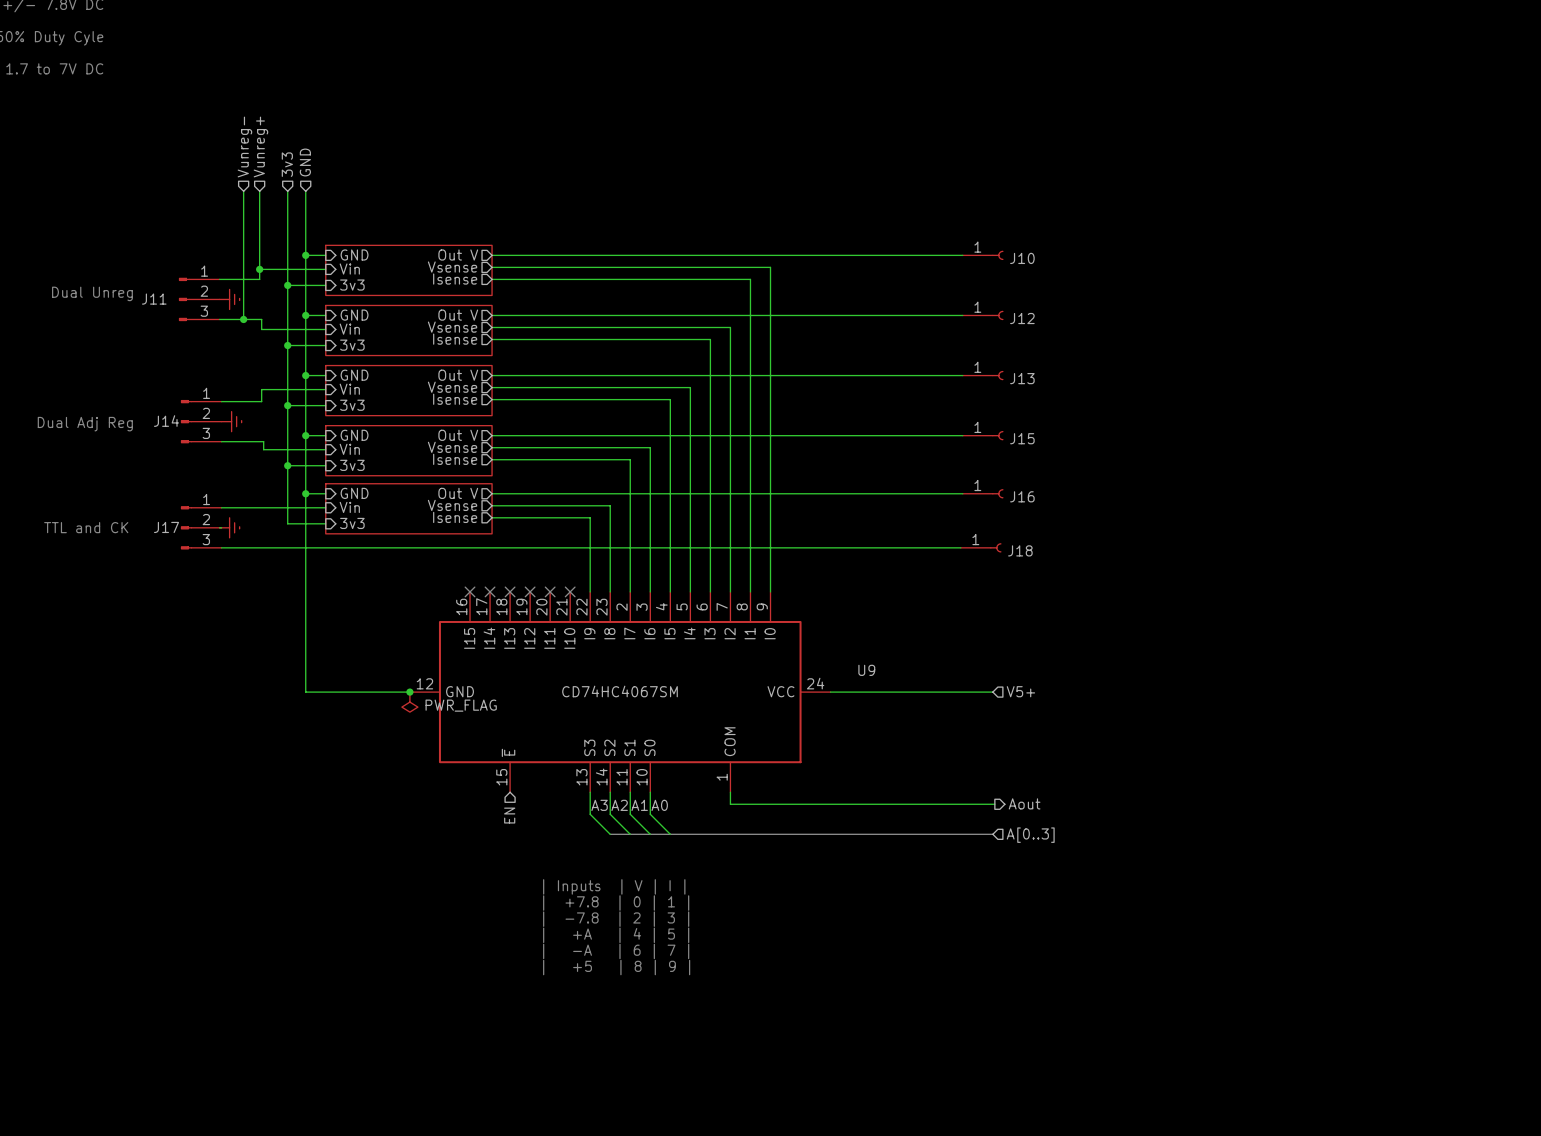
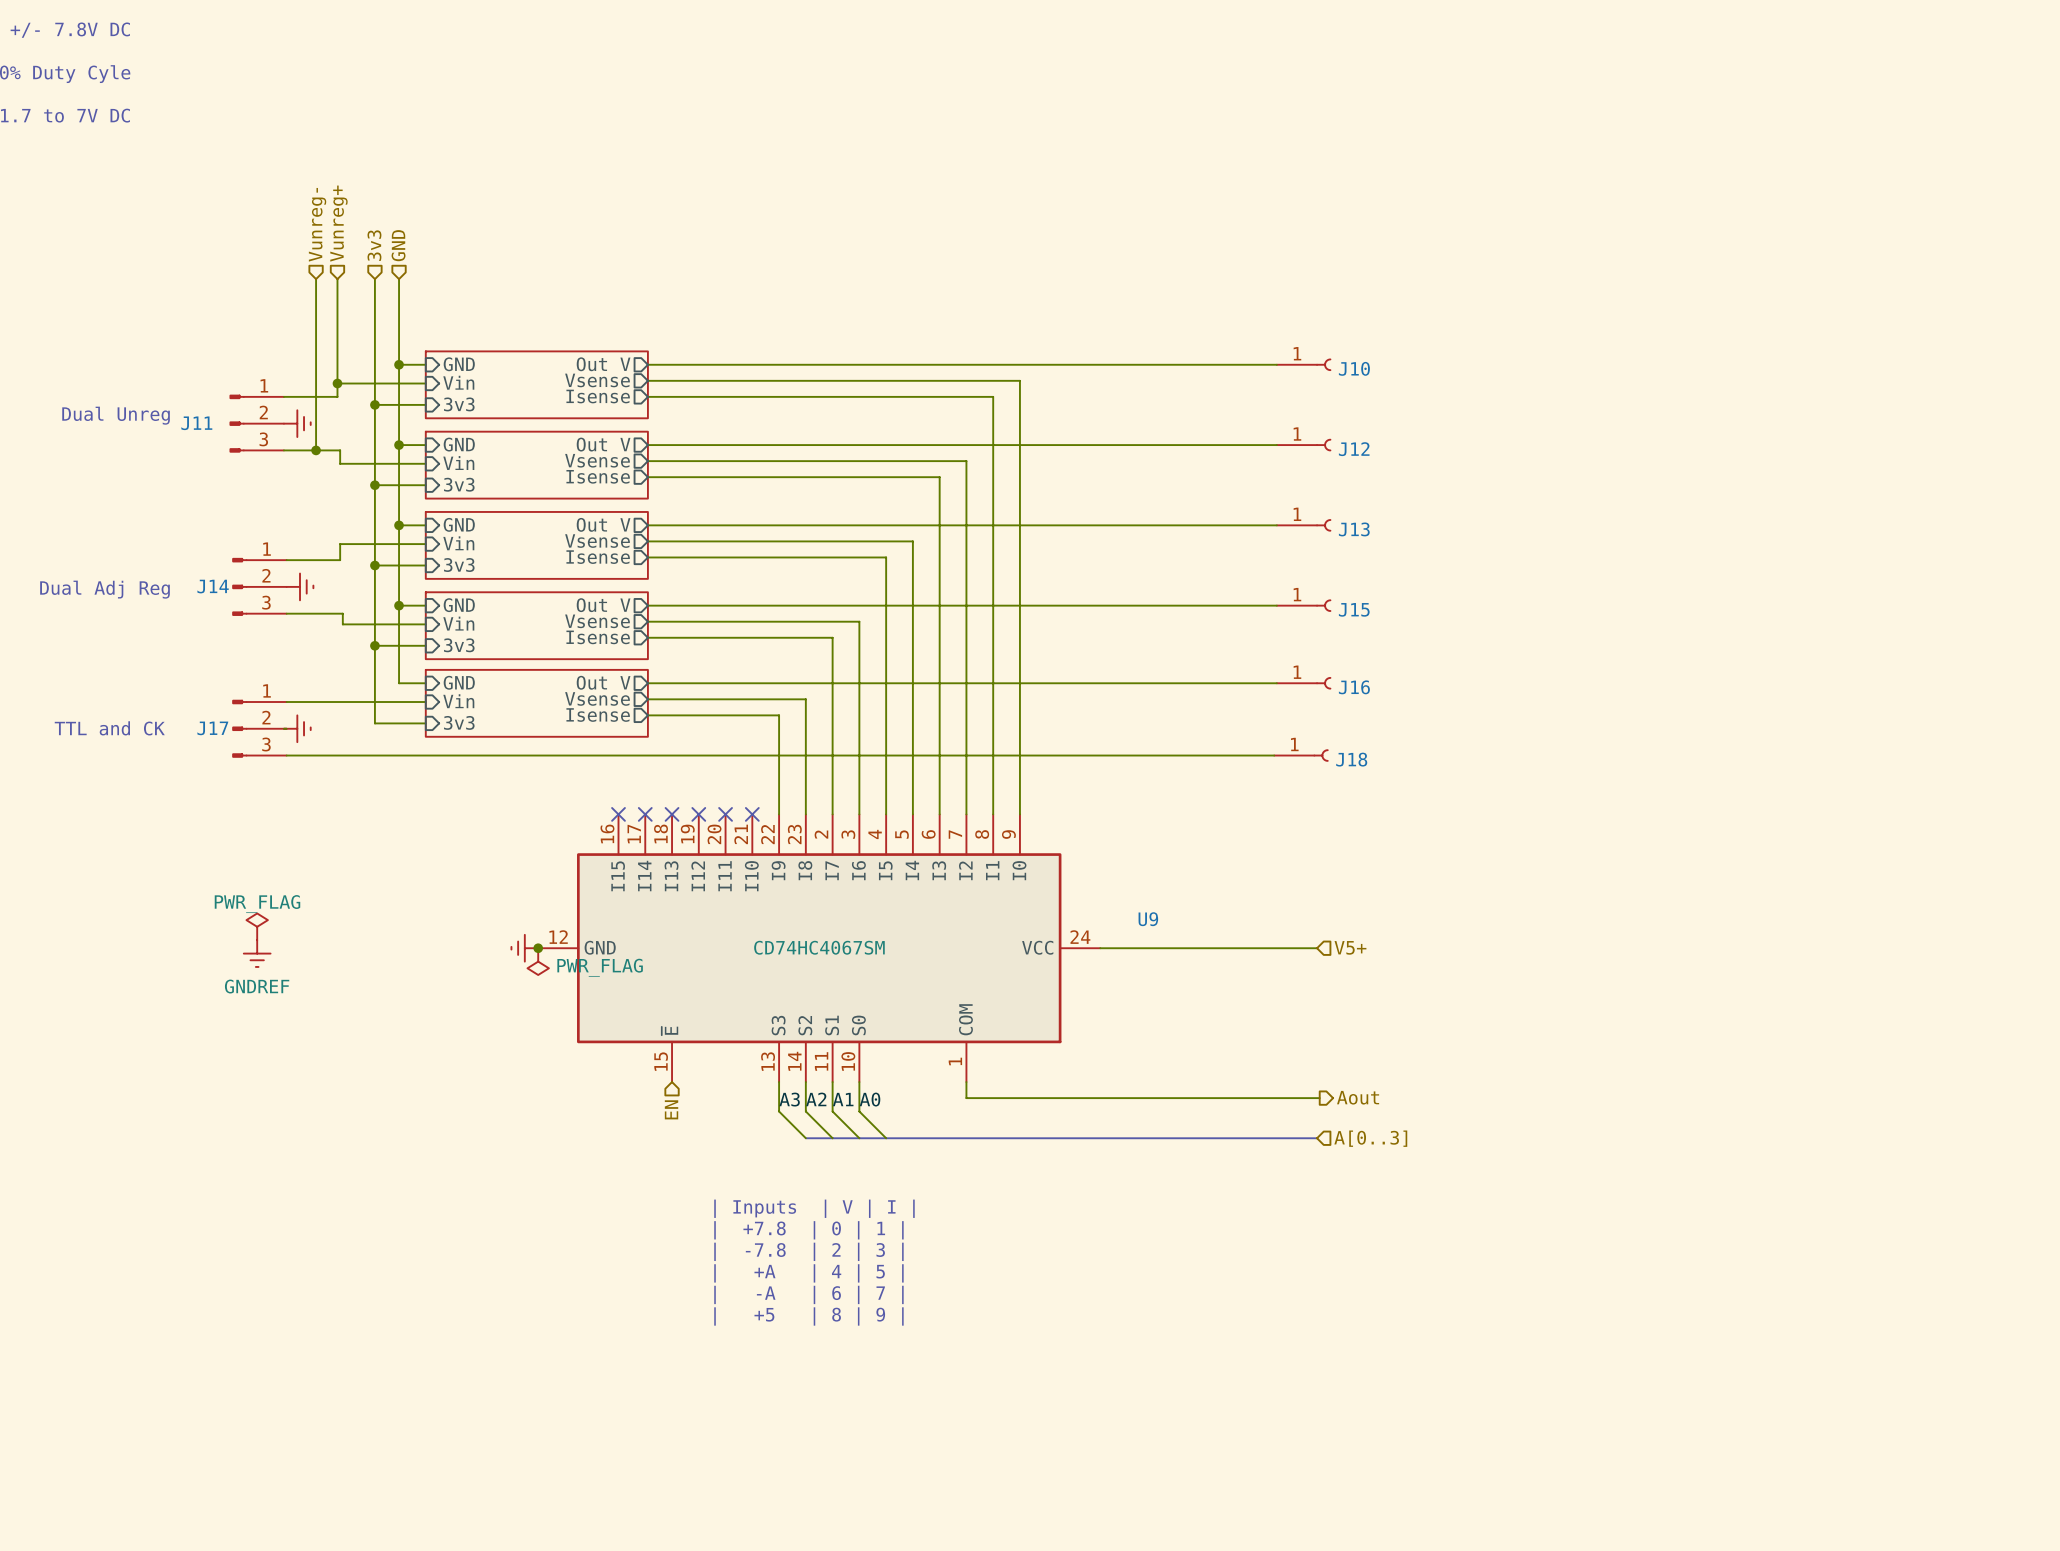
wire: (305, 493) (305, 692) (409, 692) -> none
junction: (305, 493) -> none
power symbol: none -> PWR_FLAG (257, 926)
power symbol: none -> (524, 948)
power symbol: none -> GNDREF (257, 953)

